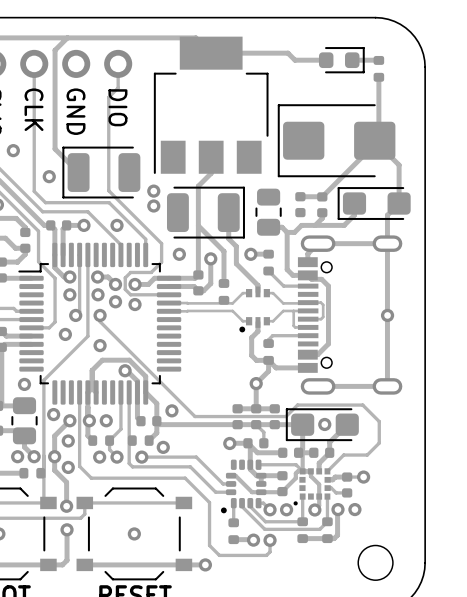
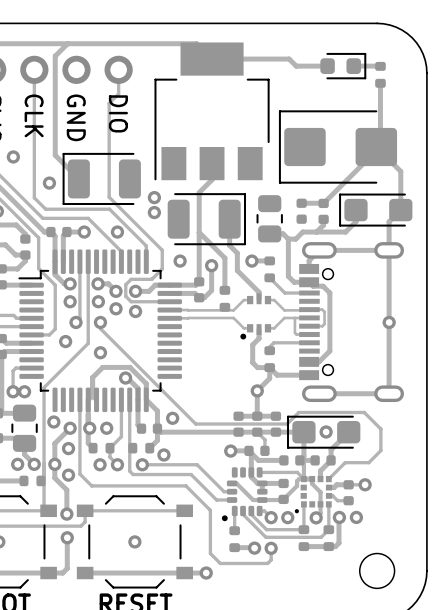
track: none -> (31, 368) (15, 368) (13, 371) (13, 391)
via: none -> (13, 391)

